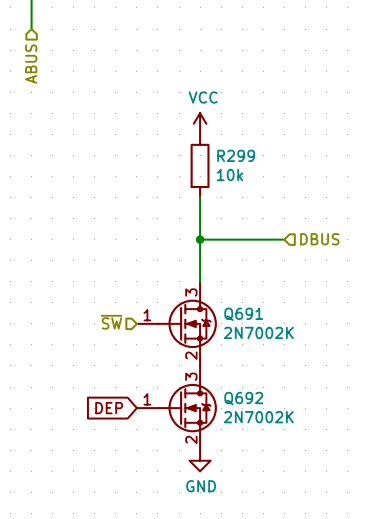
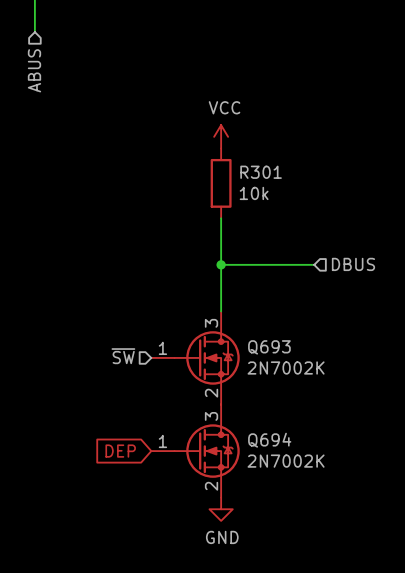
R299 name: R299 (236, 155) -> R301 (261, 172)
Q691 name: Q691 (243, 314) -> Q693 (269, 347)
Q692 name: Q692 (243, 398) -> Q694 (269, 440)

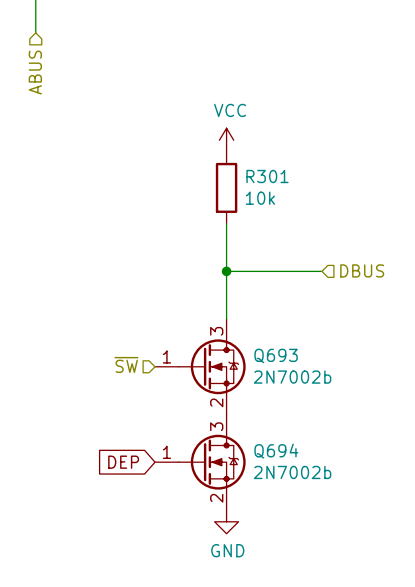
Q693 value: 2N7002K (286, 368) -> 2N7002b (292, 377)
Q694 value: 2N7002K (286, 461) -> 2N7002b (292, 472)

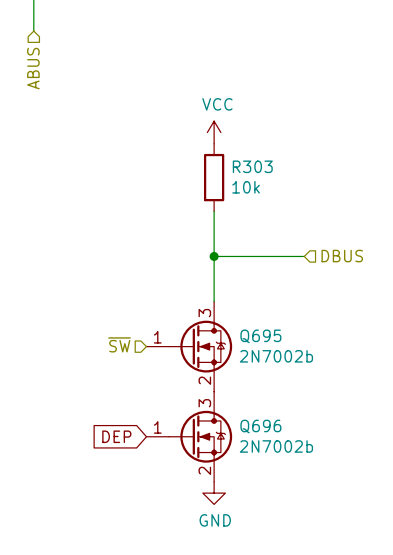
R301 name: R301 (267, 176) -> R303 (252, 166)
Q693 name: Q693 (276, 355) -> Q695 (260, 336)
Q694 name: Q694 (276, 451) -> Q696 (260, 426)

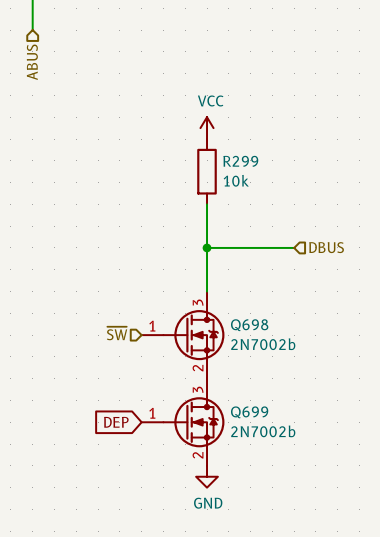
R303 name: R303 (252, 166) -> R299 (240, 161)
Q695 name: Q695 (260, 336) -> Q698 (249, 325)
Q696 name: Q696 (260, 426) -> Q699 (249, 412)

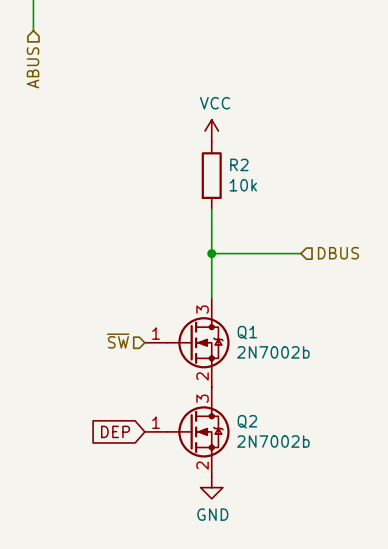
R299 name: R299 (240, 161) -> R2 (239, 164)
Q698 name: Q698 (249, 325) -> Q1 (247, 332)
Q699 name: Q699 (249, 412) -> Q2 (247, 421)

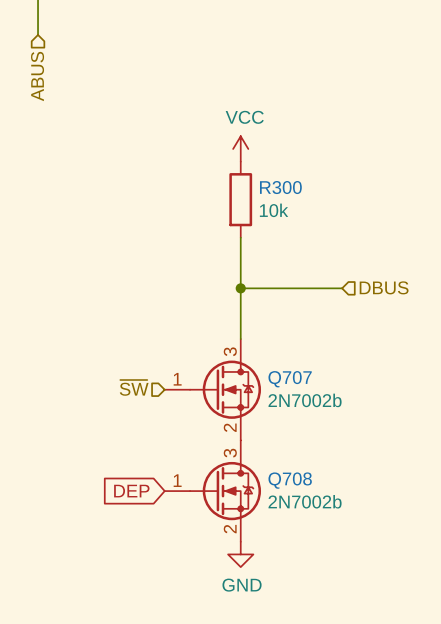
R2 name: R2 (239, 164) -> R300 (280, 187)
Q1 name: Q1 (247, 332) -> Q707 (290, 379)
Q2 name: Q2 (247, 421) -> Q708 (290, 480)

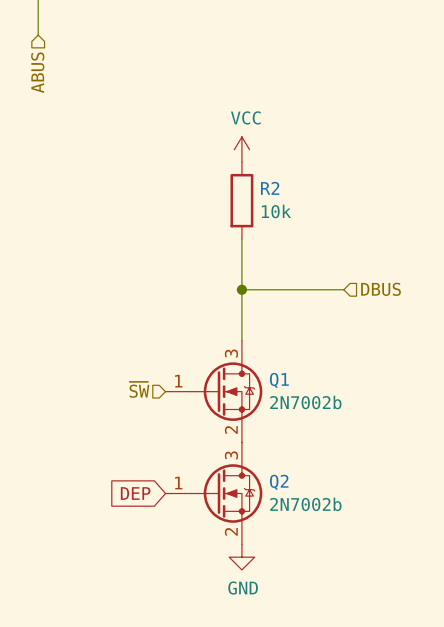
R300 name: R300 (280, 187) -> R2 (270, 188)
Q707 name: Q707 (290, 379) -> Q1 (279, 380)
Q708 name: Q708 (290, 480) -> Q2 (279, 482)

